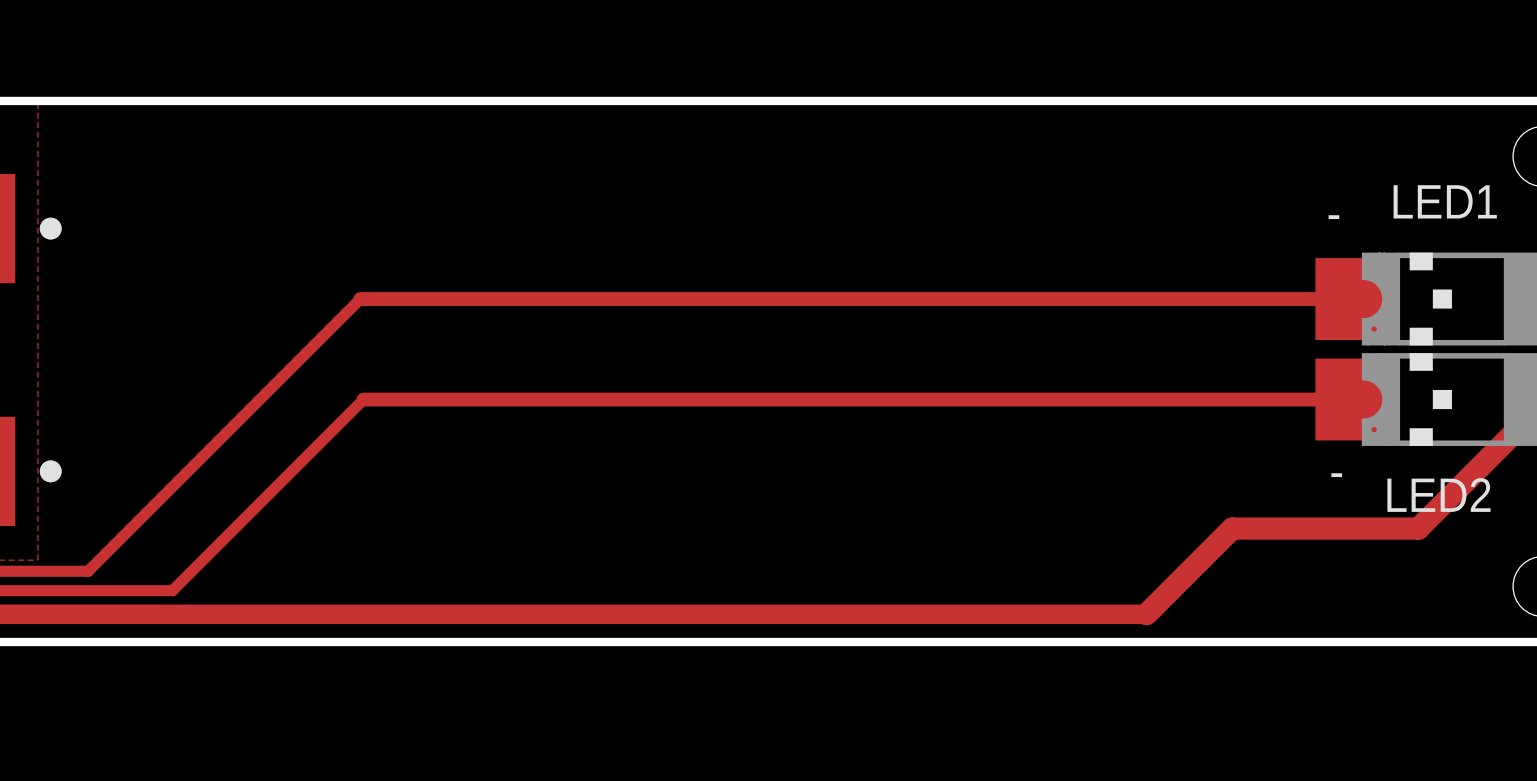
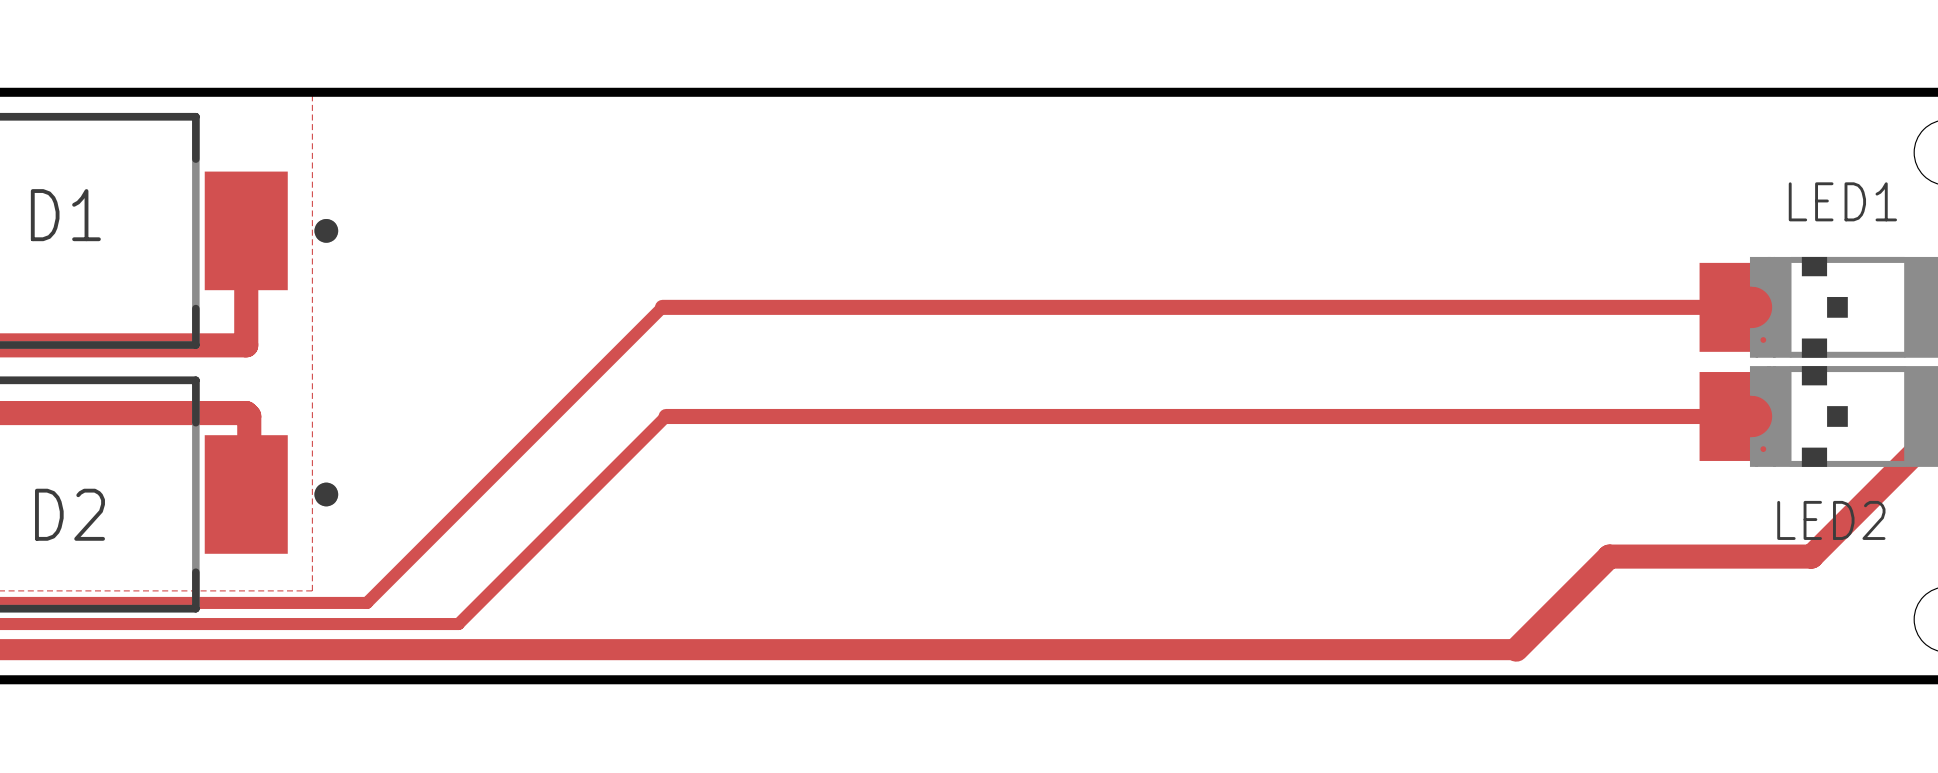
text: - (1333, 217) -> none
text: - (1336, 475) -> none

